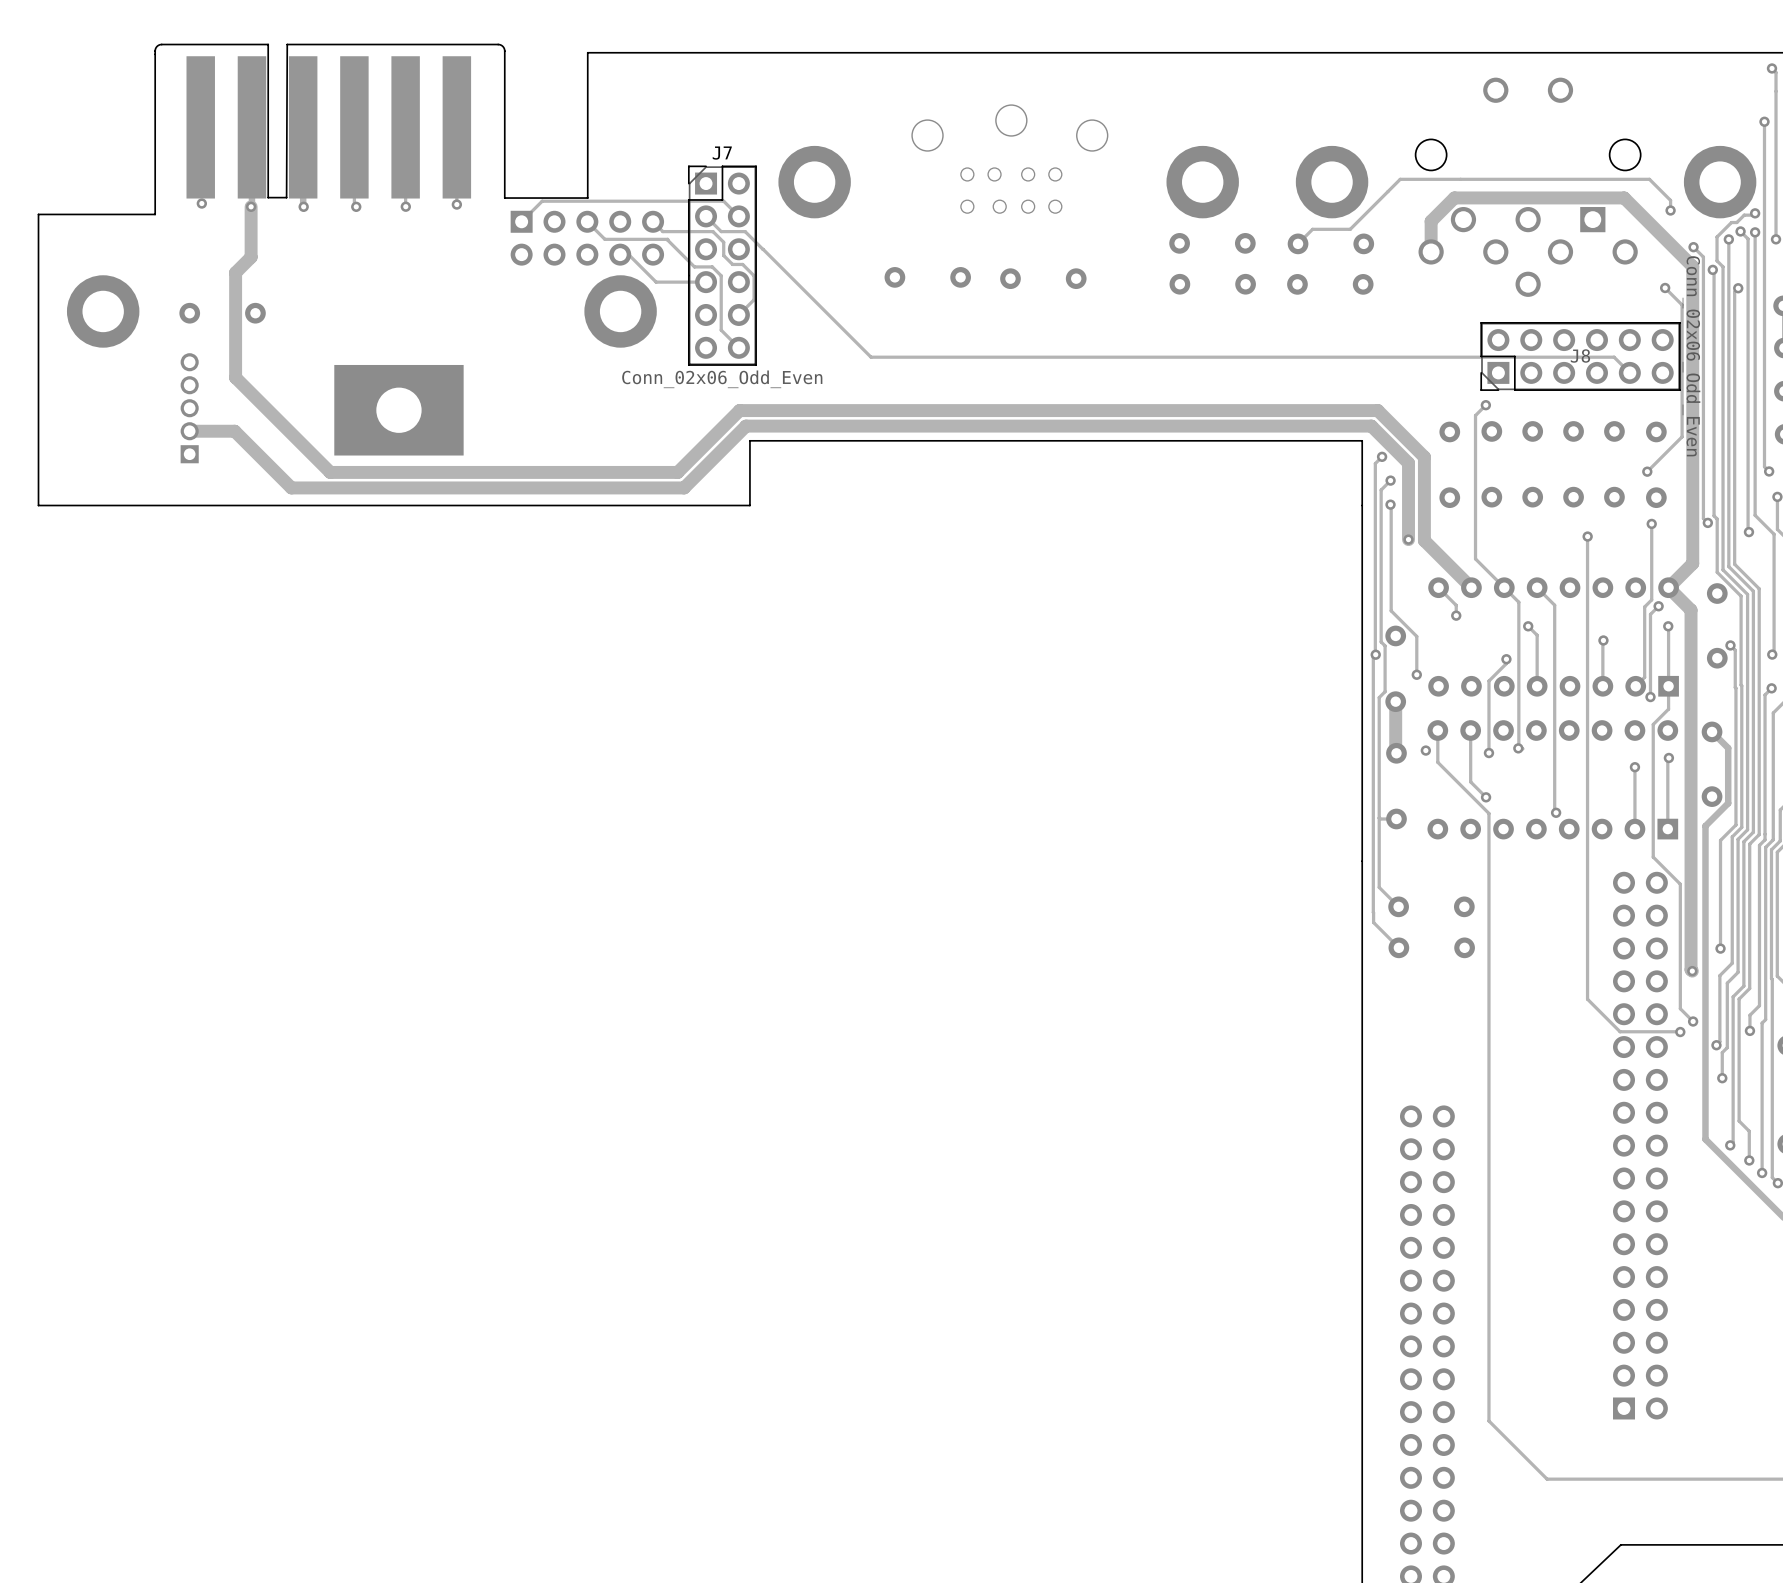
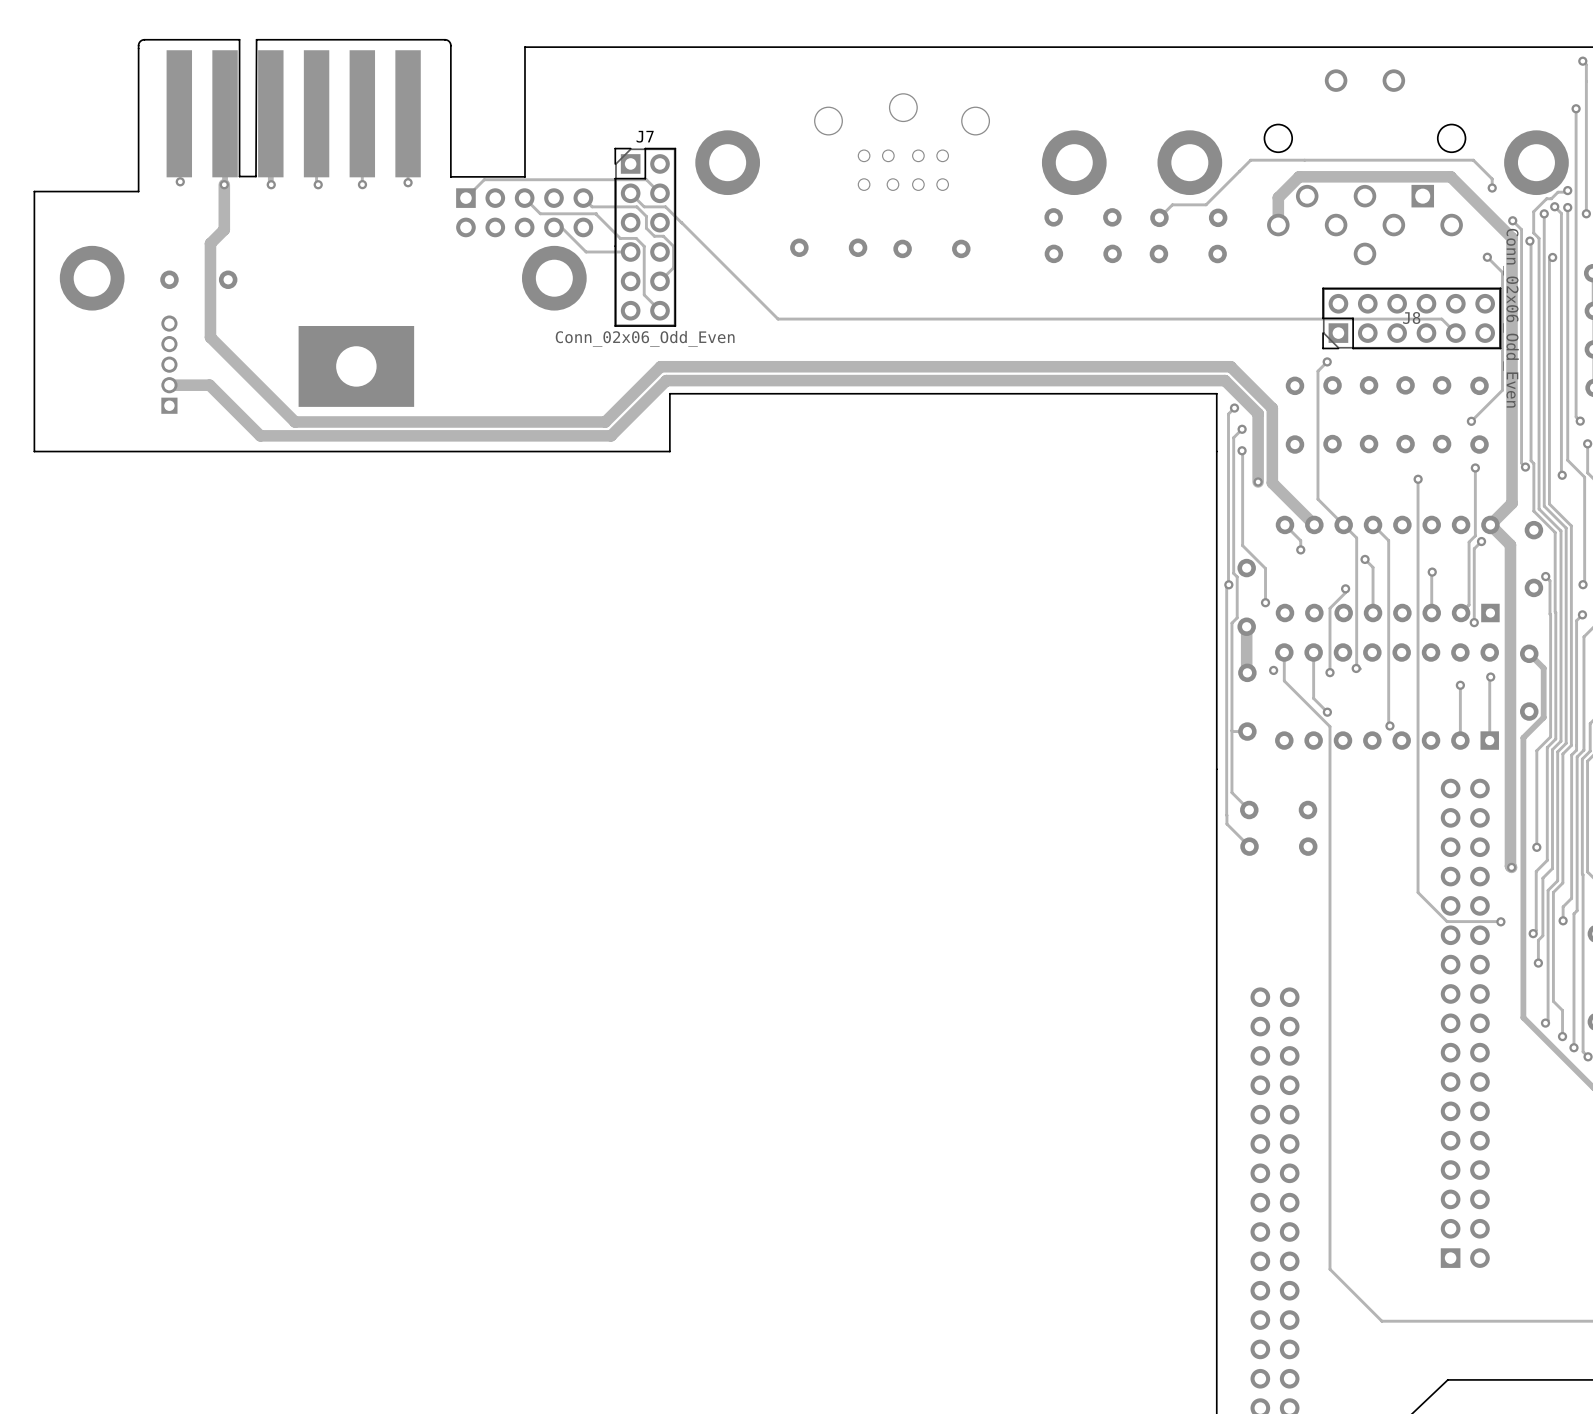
track: (1668, 626) (1668, 709) (1653, 724) (1653, 857) (1680, 884) (1680, 1008) (1693, 1021) -> none
via: (1668, 626) -> none
via: (1693, 1021) -> none

